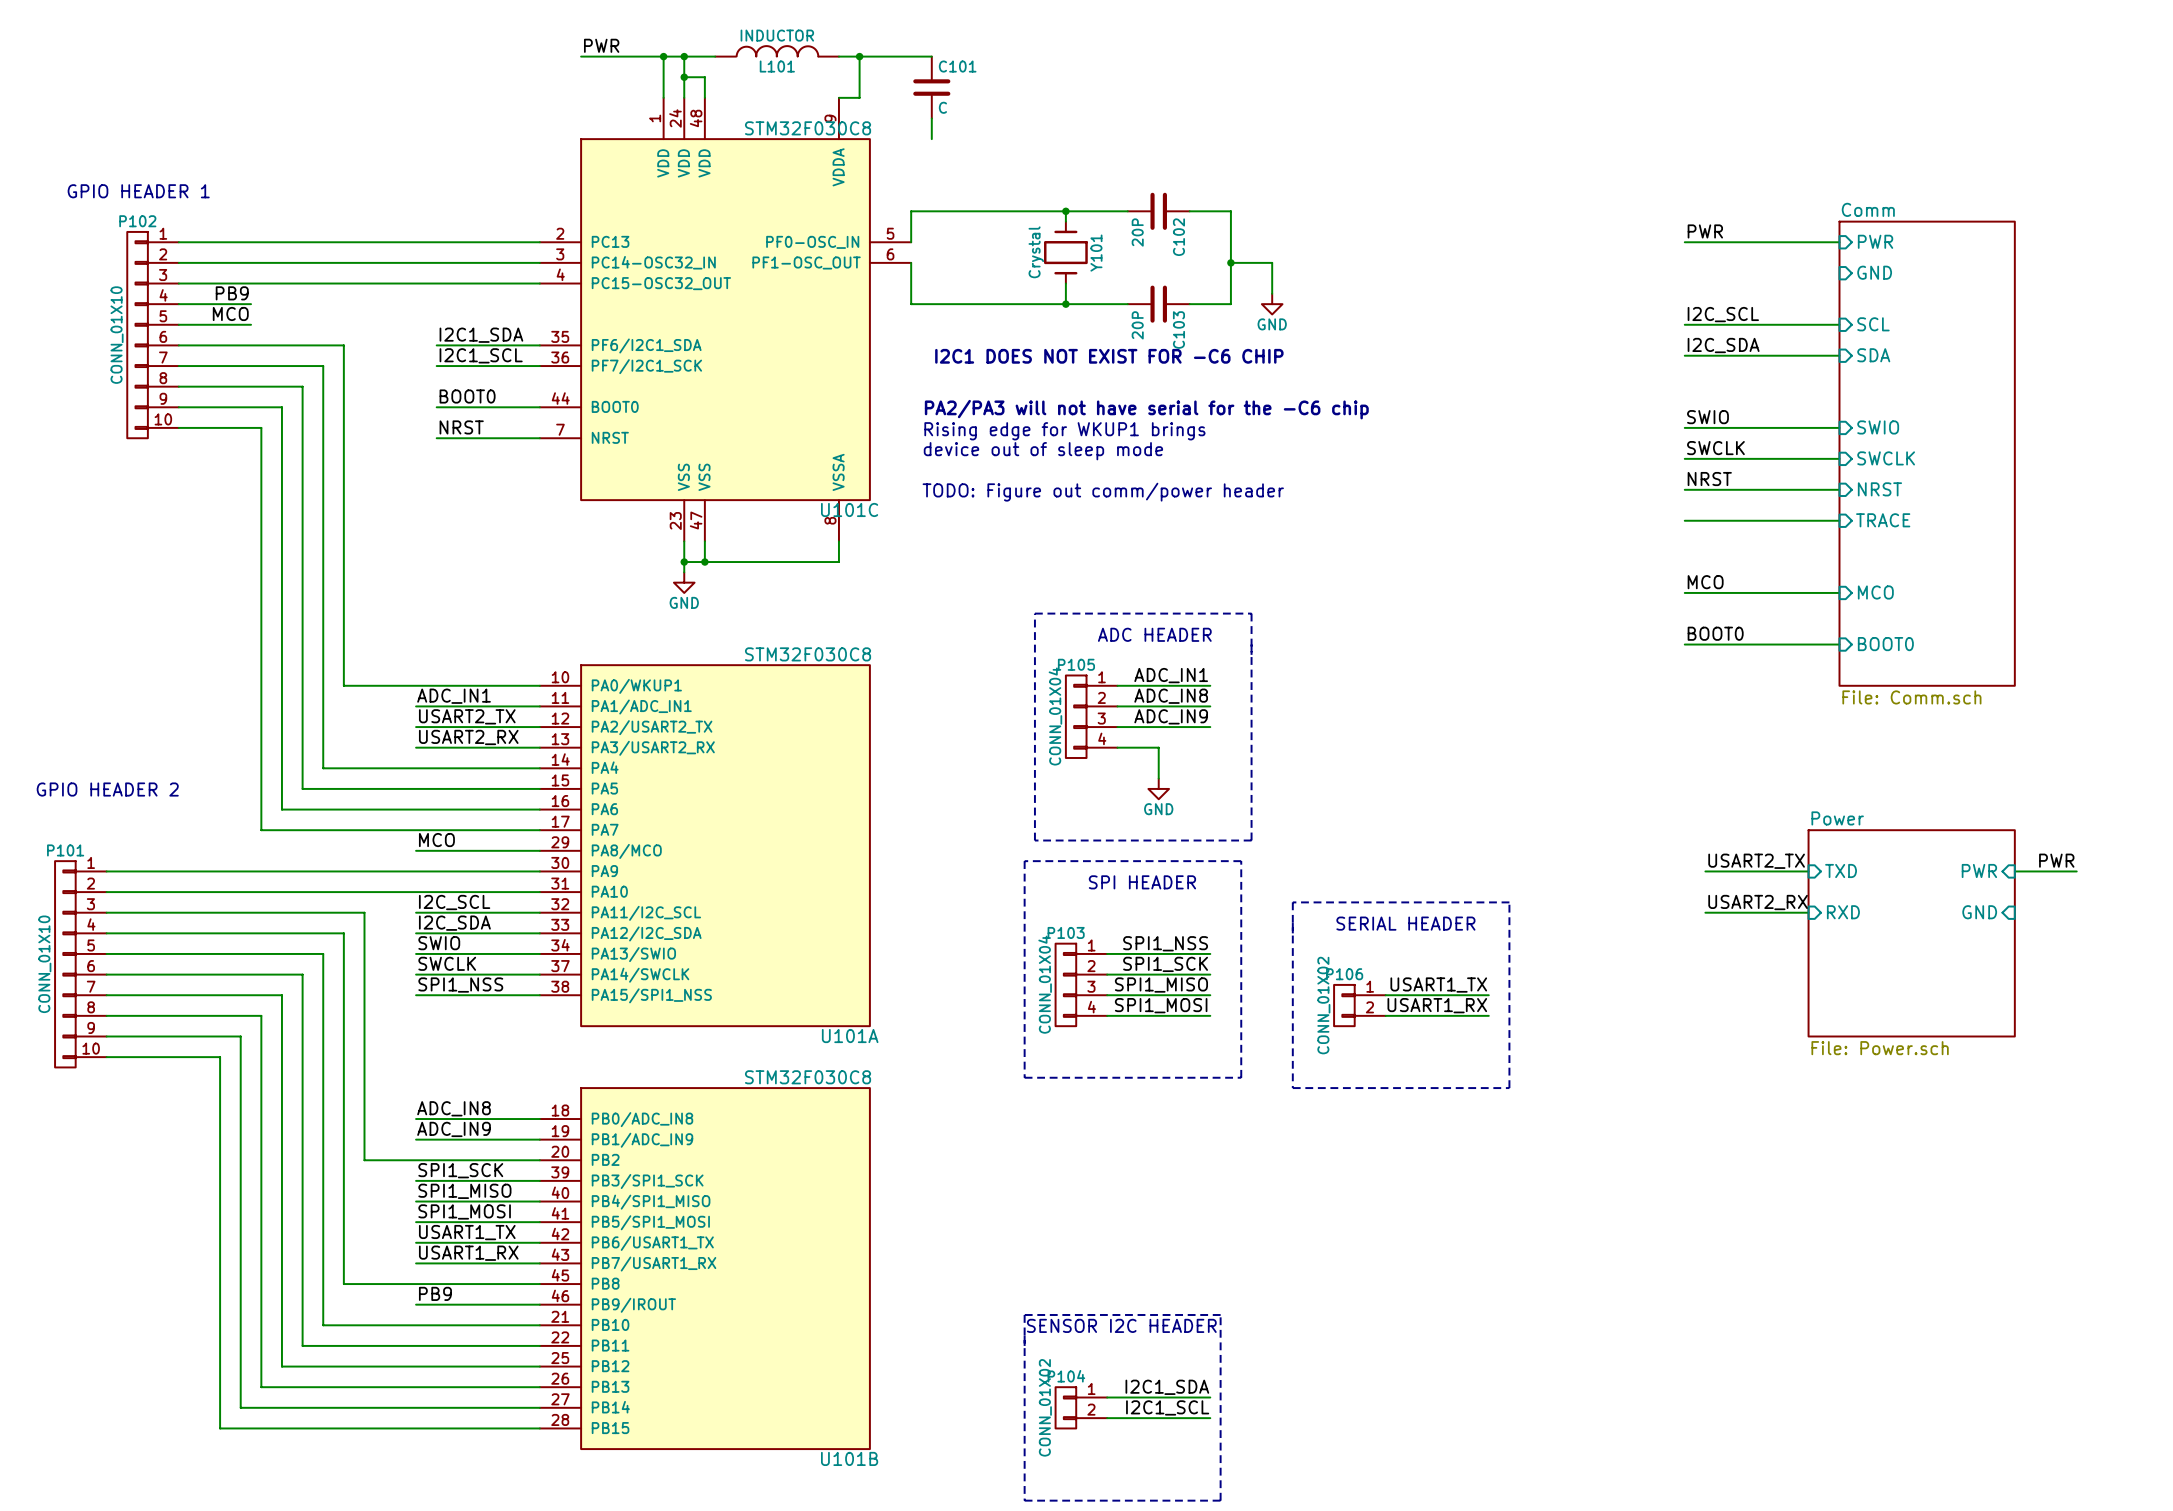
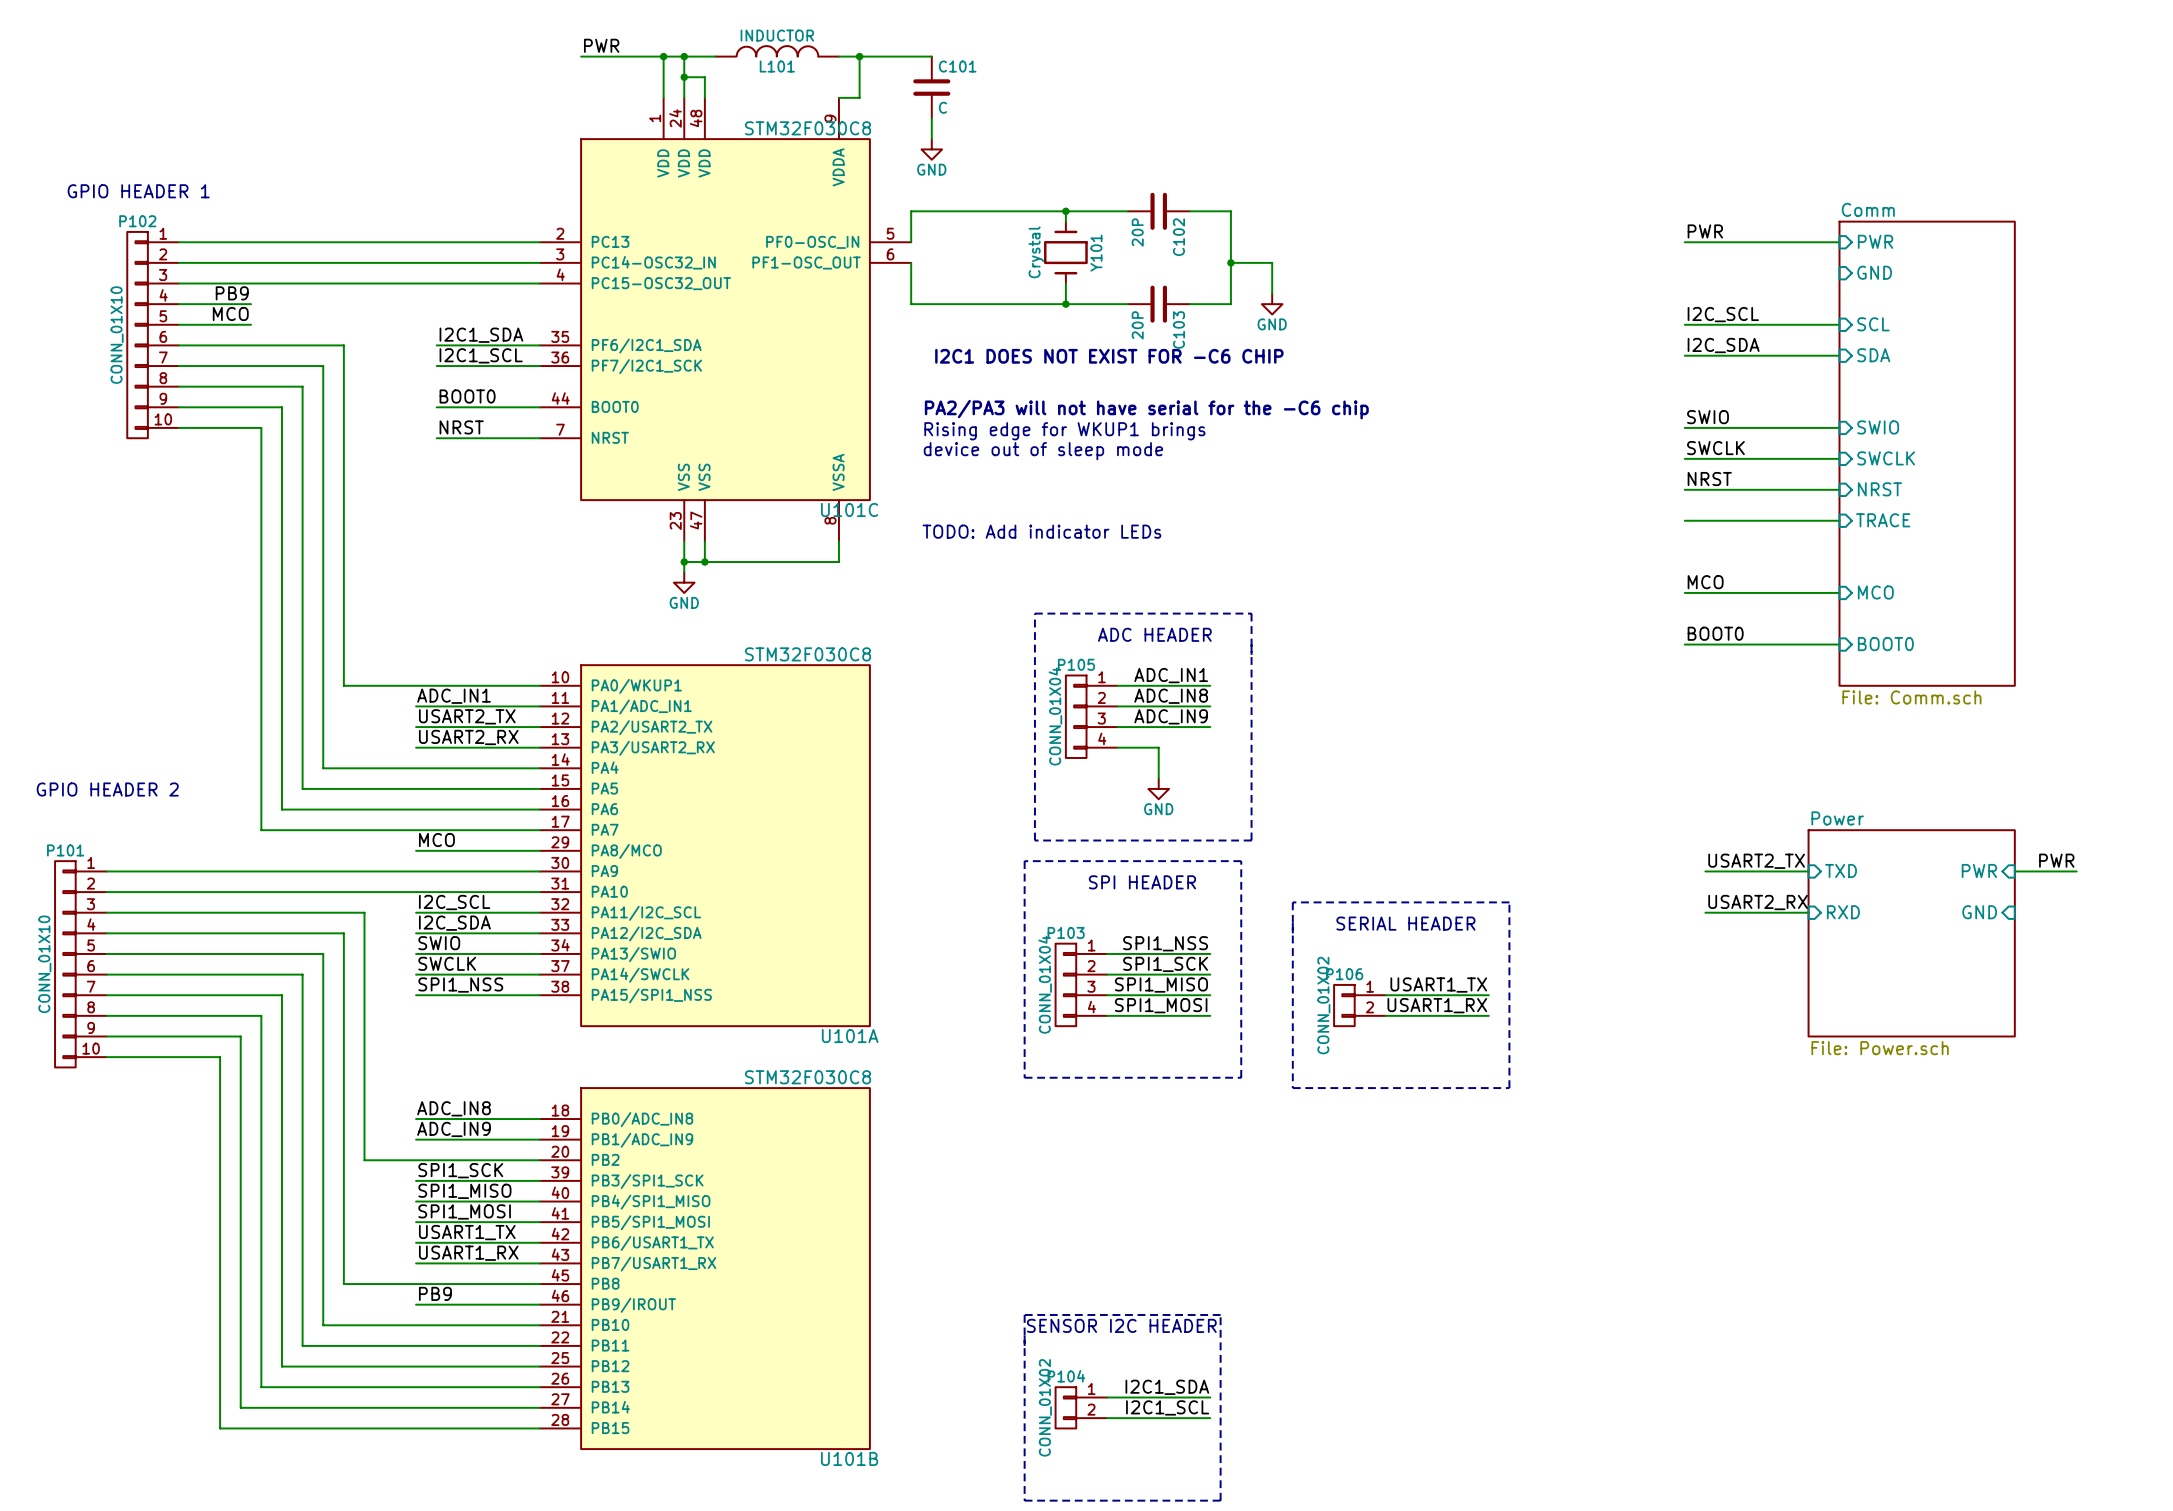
power symbol: none -> GND (931, 149)
text: TODO: Figure out comm/power header (1103, 492) -> none
text: none -> TODO: Add indicator LEDs (1041, 531)

